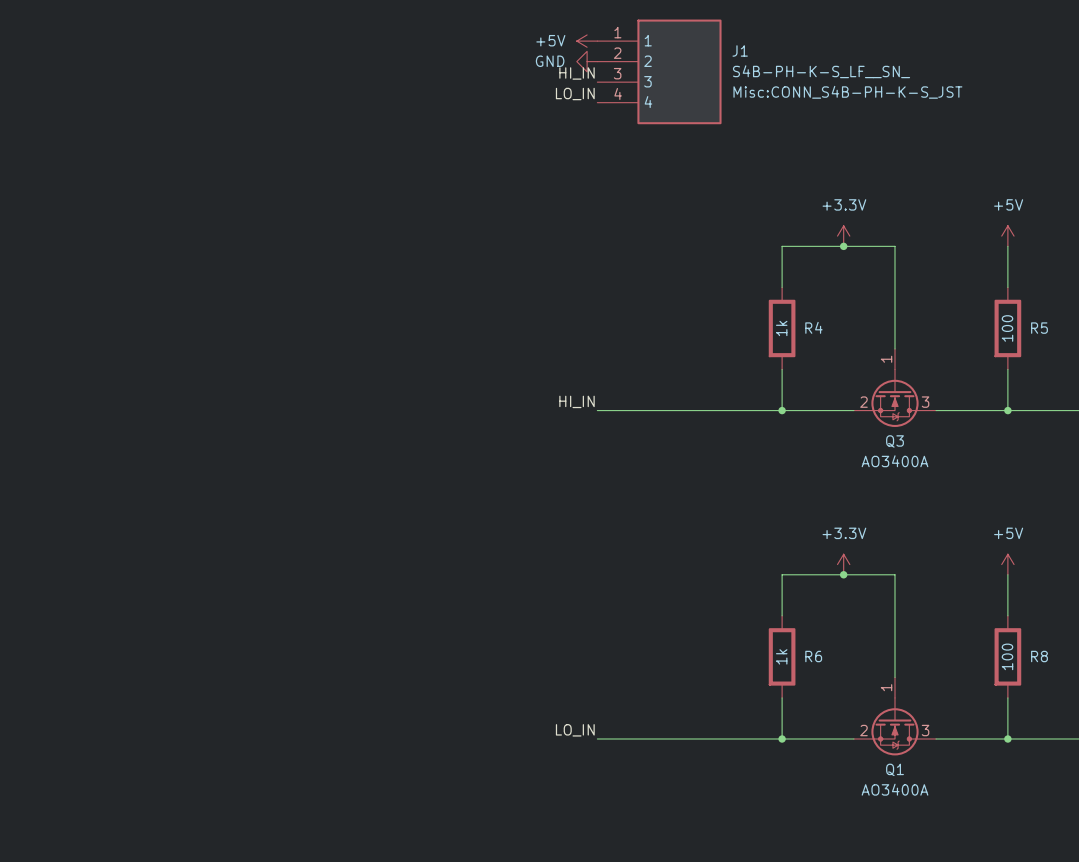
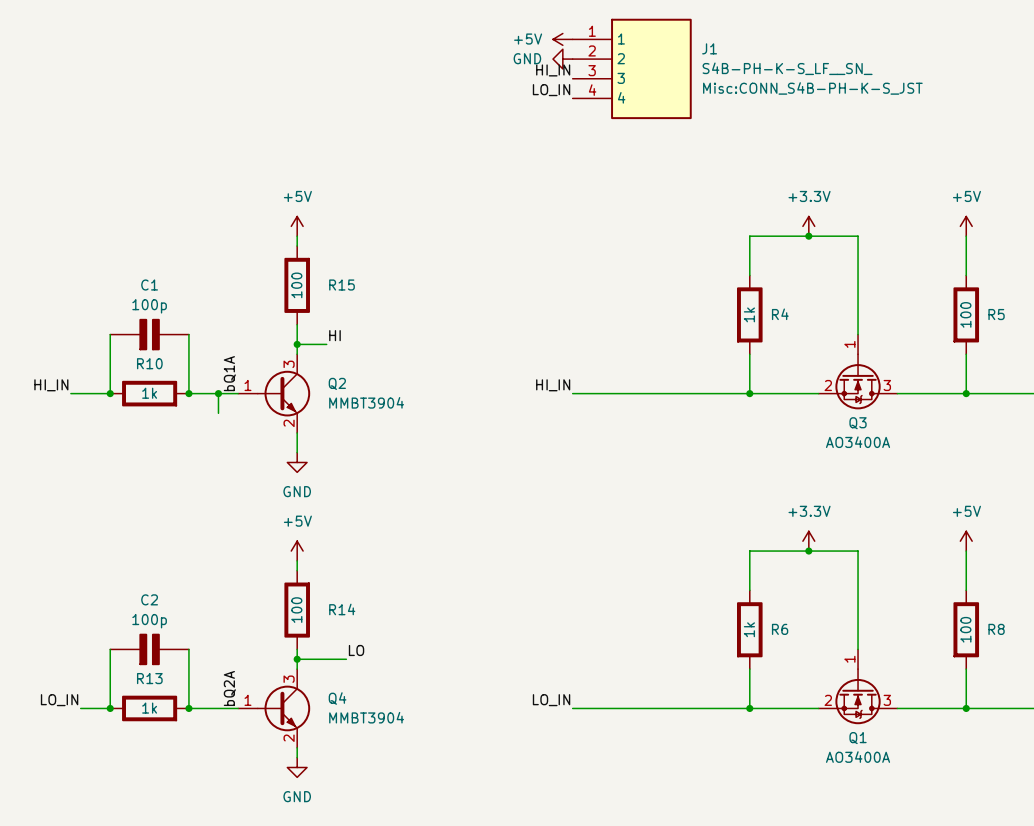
power symbol: none -> +5V (297, 226)
wire: none -> (297, 236) (297, 246)
R15: none -> 100 (297, 285)
wire: none -> (297, 324) (297, 354)
wire: none -> (110, 334) (110, 393) (70, 393)
C1: none -> 100p (149, 334)
wire: none -> (188, 334) (188, 393) (238, 393)
label: none -> HI (334, 335)
wire: none -> (297, 344) (326, 344)
junction: none -> (297, 344)
label: none -> bQ1A (229, 373)
label: none -> HI_IN (51, 385)
junction: none -> (110, 393)
R10: none -> 1k (149, 393)
junction: none -> (188, 393)
wire: none -> (218, 393) (218, 413)
junction: none -> (218, 393)
Q2: none -> MMBT3904 (274, 393)
wire: none -> (297, 432) (297, 452)
power symbol: none -> GND (297, 462)
power symbol: none -> +5V (297, 551)
wire: none -> (297, 560) (297, 570)
R14: none -> 100 (297, 610)
wire: none -> (110, 649) (110, 708) (80, 708)
C2: none -> 100p (149, 649)
wire: none -> (188, 649) (188, 708) (238, 708)
wire: none -> (297, 649) (297, 669)
label: none -> LO (356, 650)
wire: none -> (297, 659) (346, 659)
junction: none -> (297, 659)
label: none -> bQ2A (229, 688)
label: none -> LO_IN (59, 700)
junction: none -> (110, 708)
R13: none -> 1k (149, 708)
junction: none -> (188, 708)
Q4: none -> MMBT3904 (274, 708)
wire: none -> (297, 747) (297, 757)
power symbol: none -> GND (297, 767)

